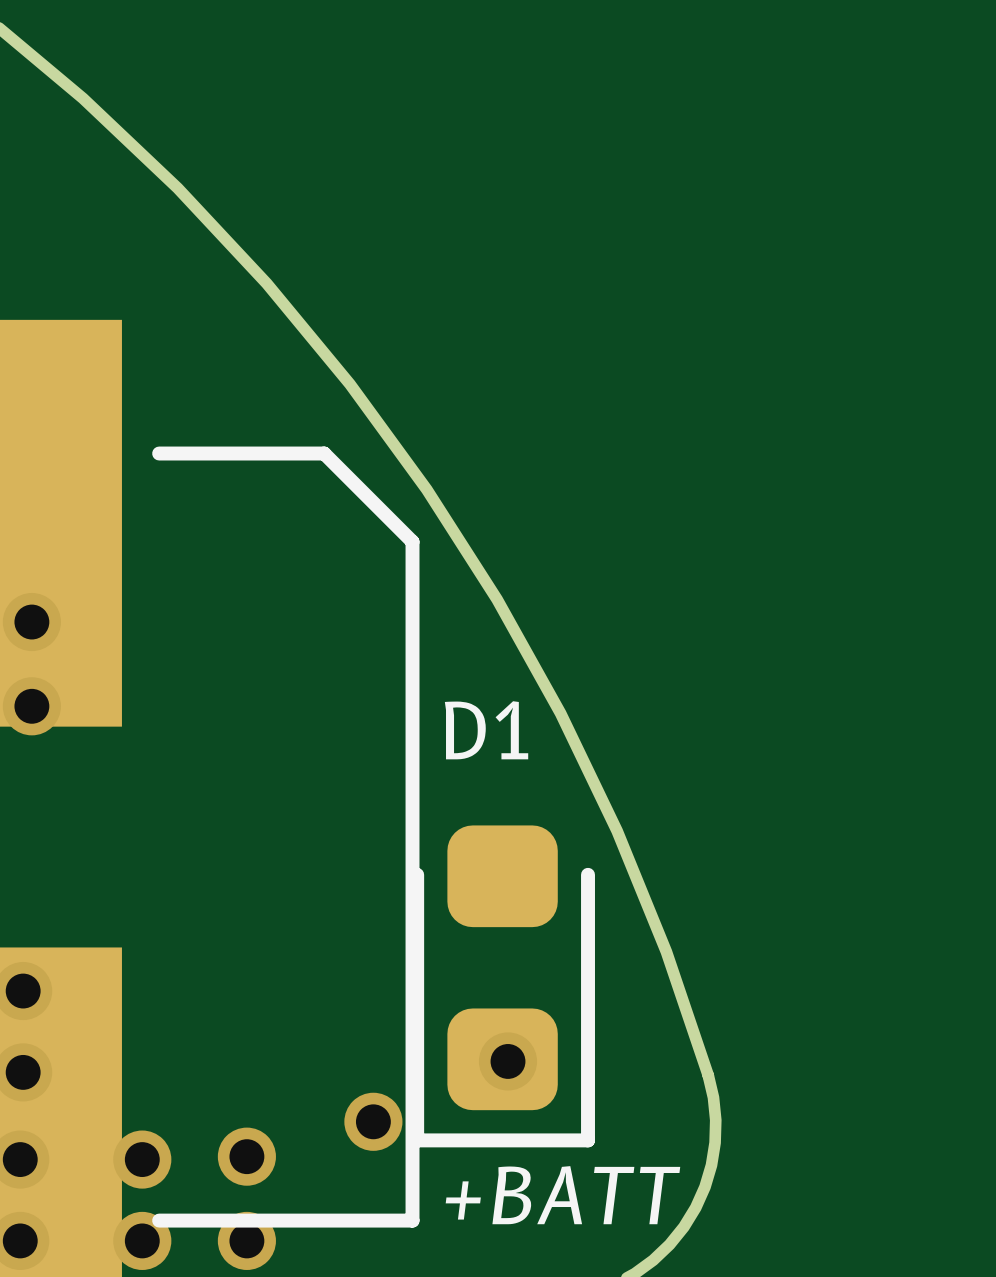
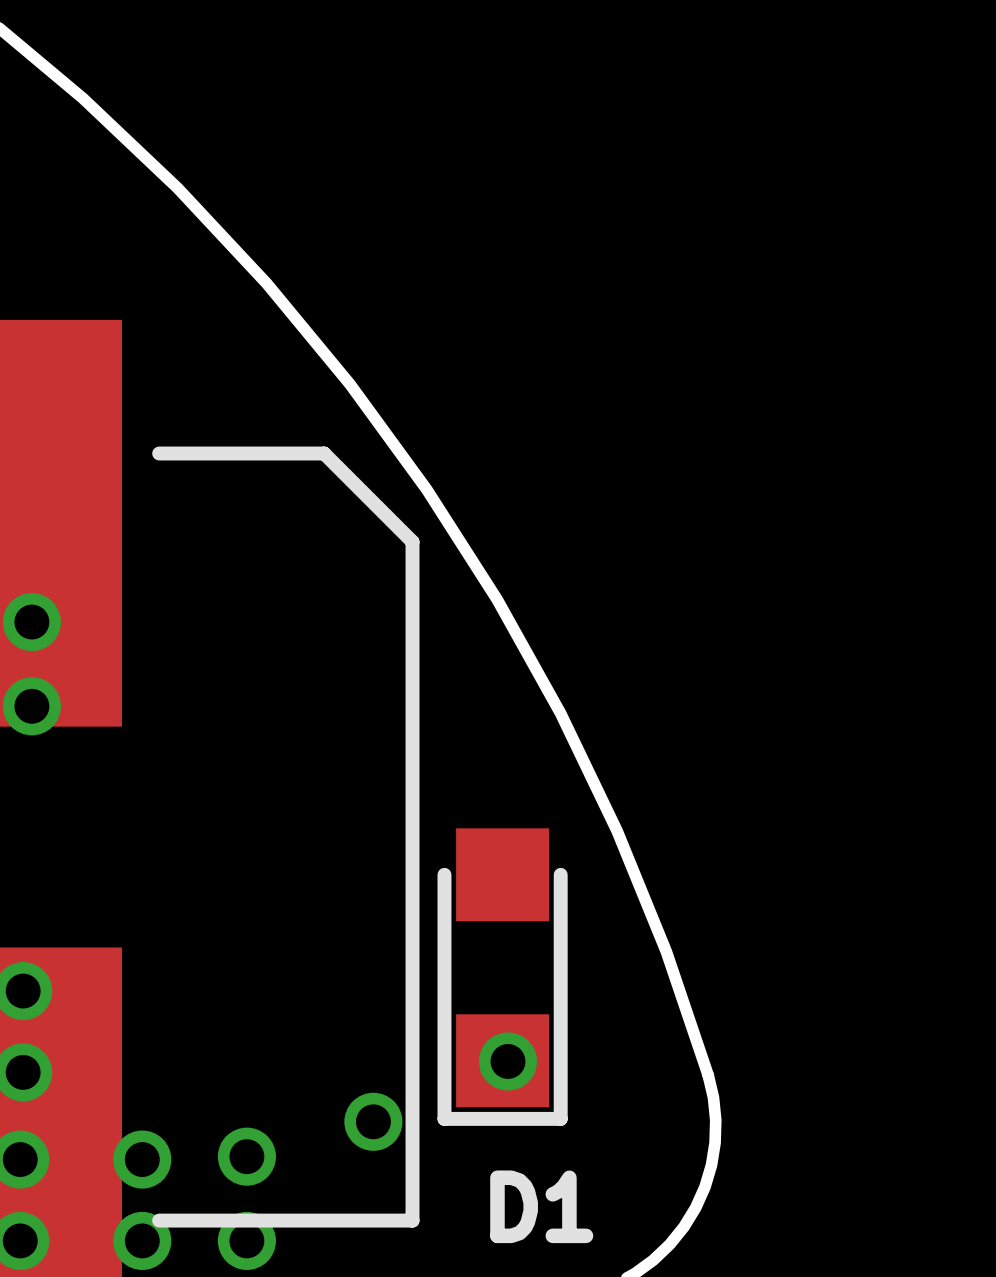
D1 name position: D1 (486, 730) -> D1 (541, 1206)
D1 footprint: [410, 825, 595, 1148] -> [437, 828, 568, 1126]
text: +BATT (562, 1195) -> none

